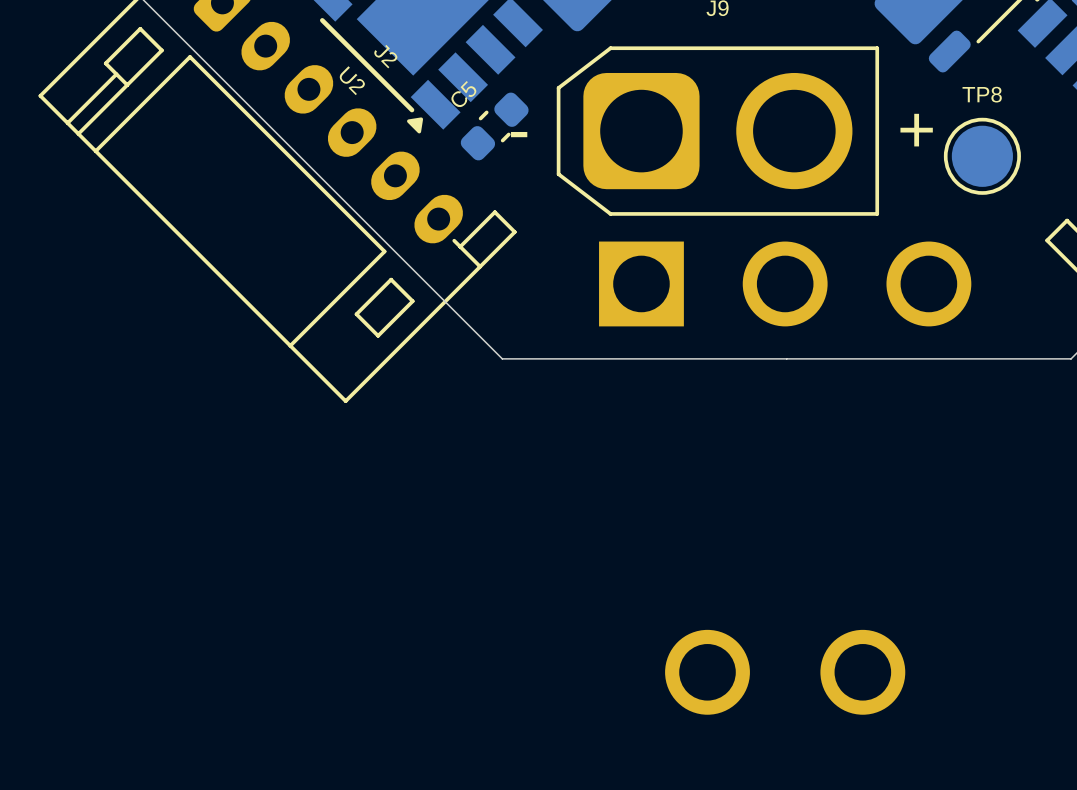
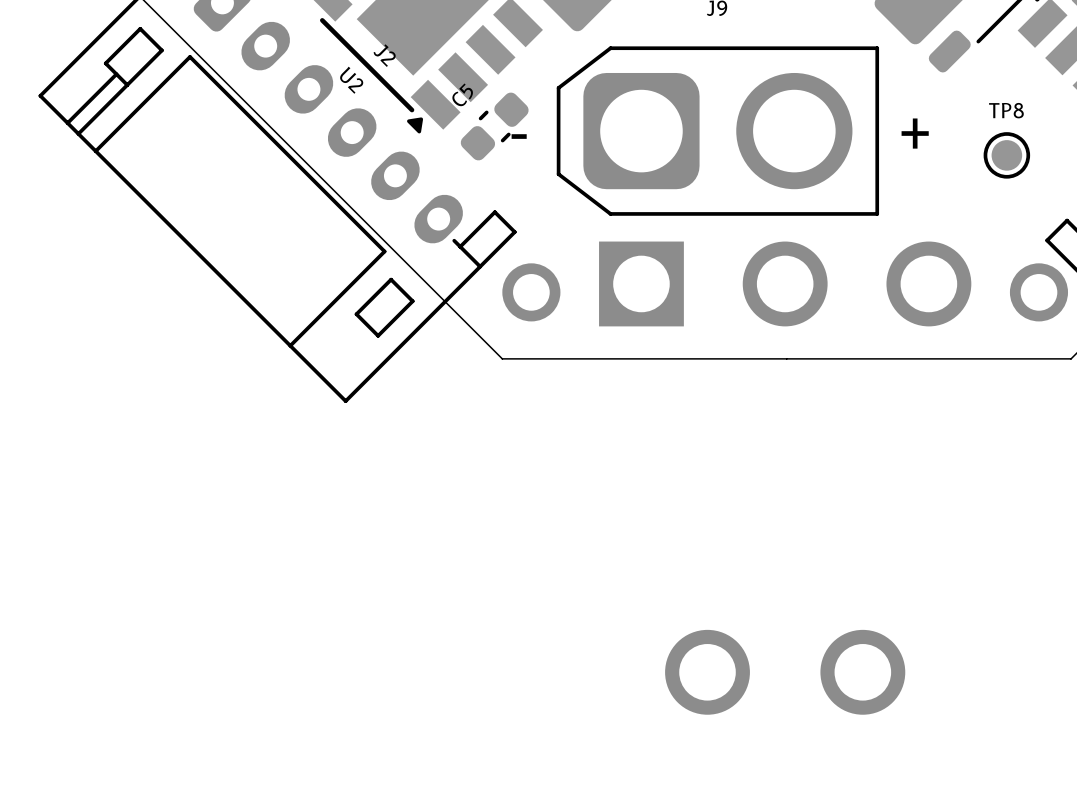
TP8 footprint: [943, 117, 1021, 195] -> [983, 132, 1031, 179]
part: none -> (531, 292)
part: none -> (1038, 292)

